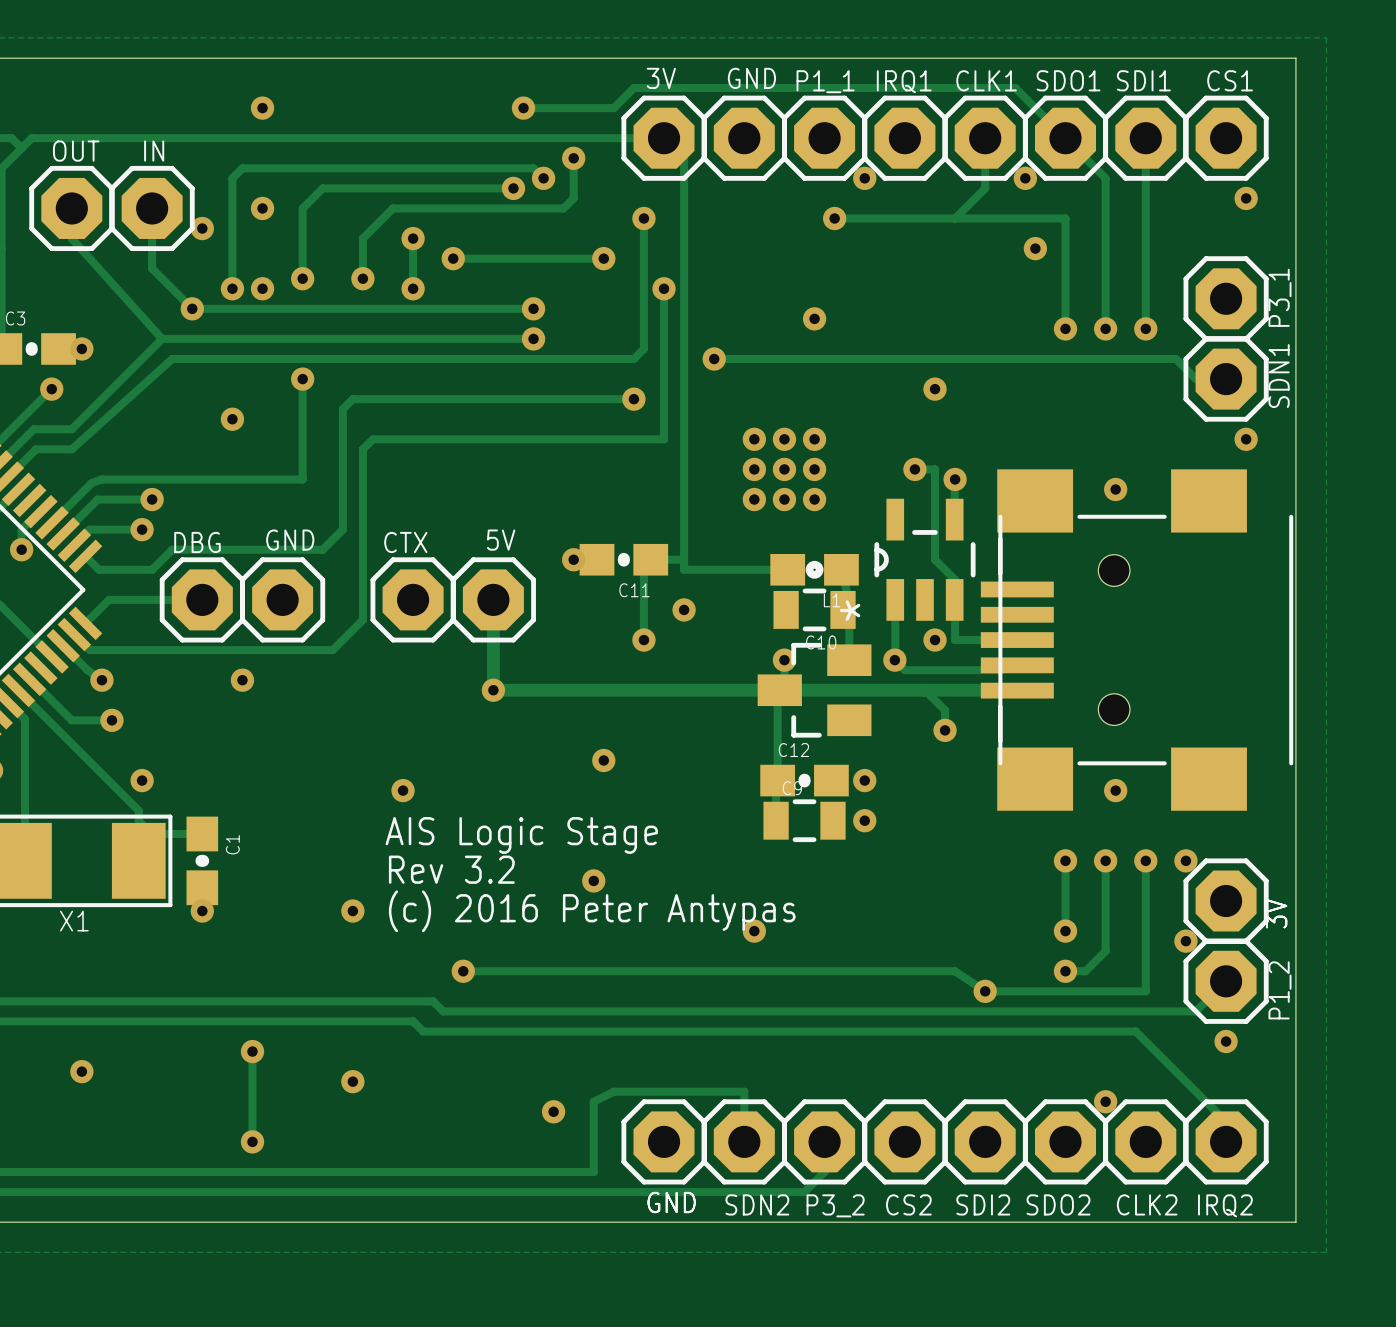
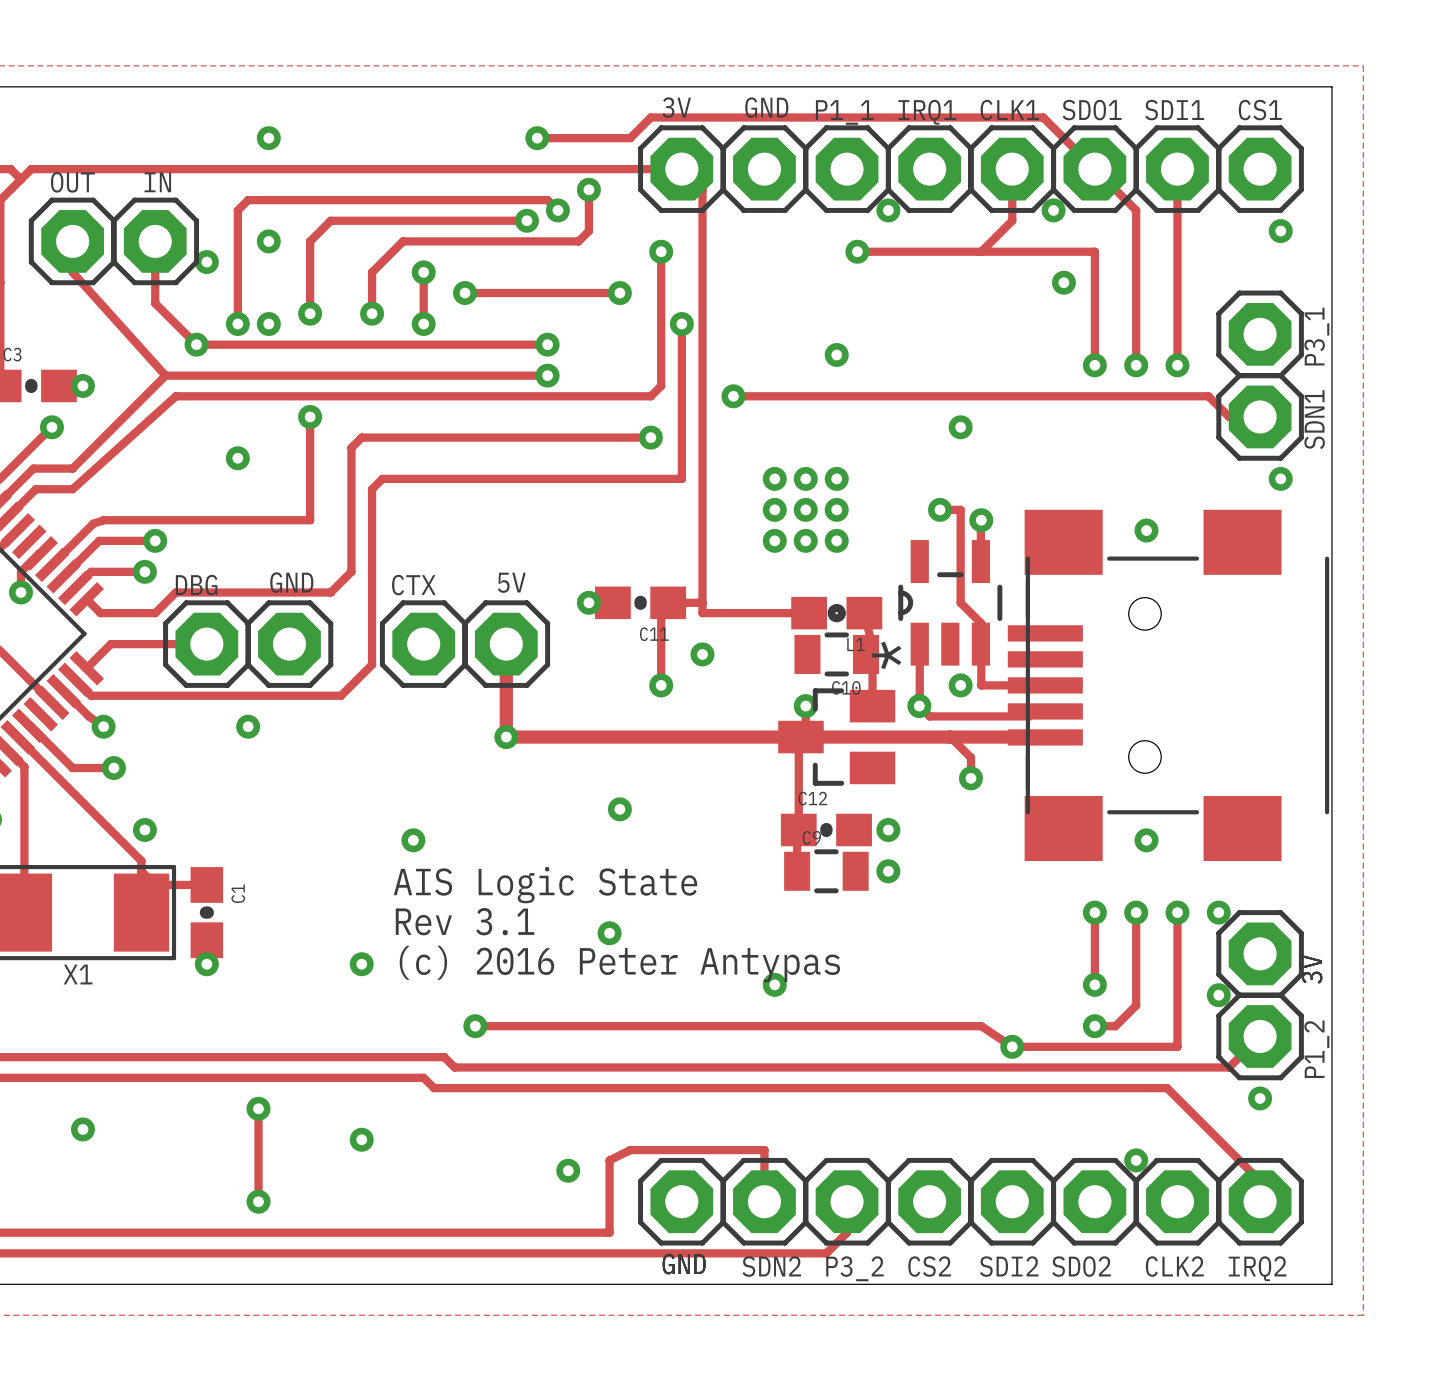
text: AIS Logic Stage (521, 835) -> AIS Logic State (545, 885)
text: Rev 3.2 (451, 869) -> Rev 3.1 (465, 921)

